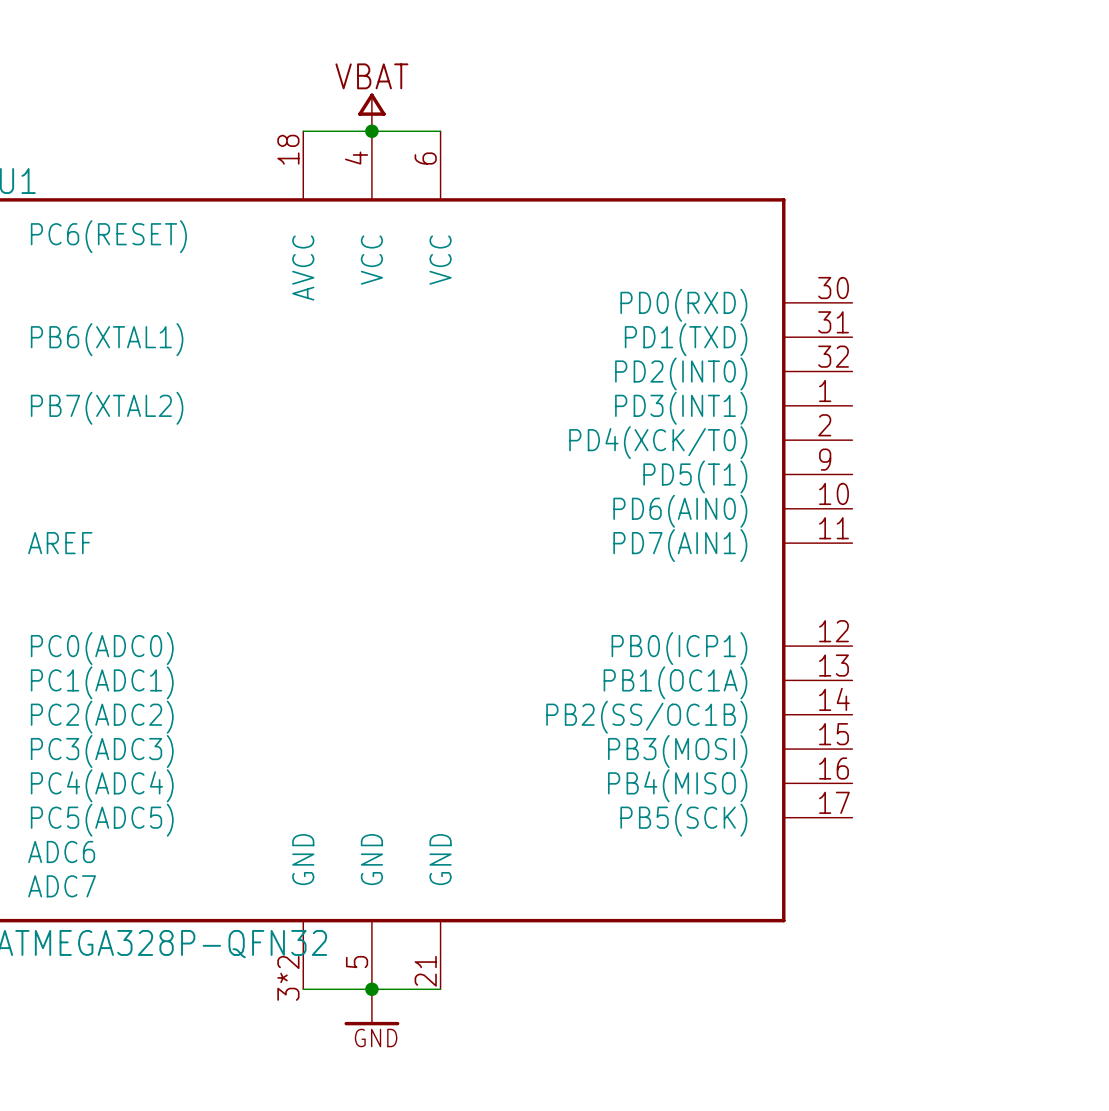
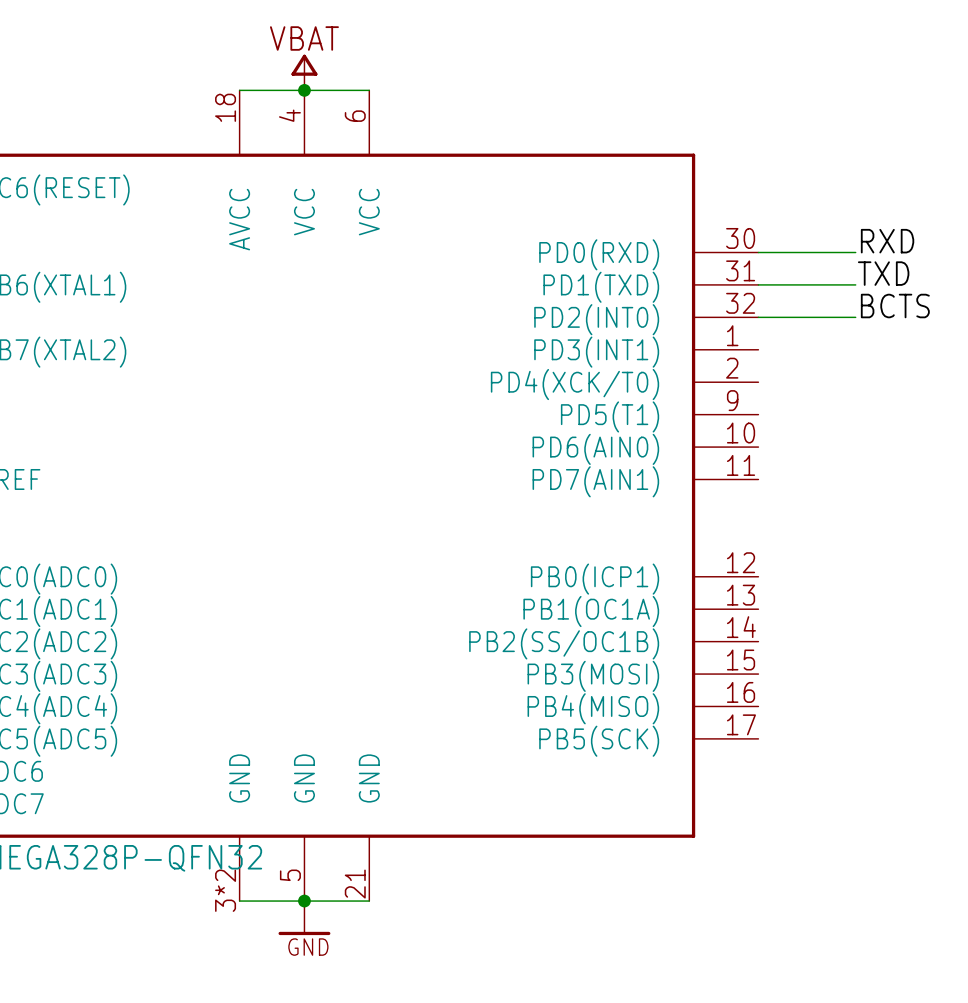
label: none -> RXD (887, 241)
wire: none -> (758, 252) (855, 252)
label: none -> TXD (883, 273)
wire: none -> (758, 284) (855, 284)
label: none -> BCTS (895, 306)
wire: none -> (758, 317) (855, 317)

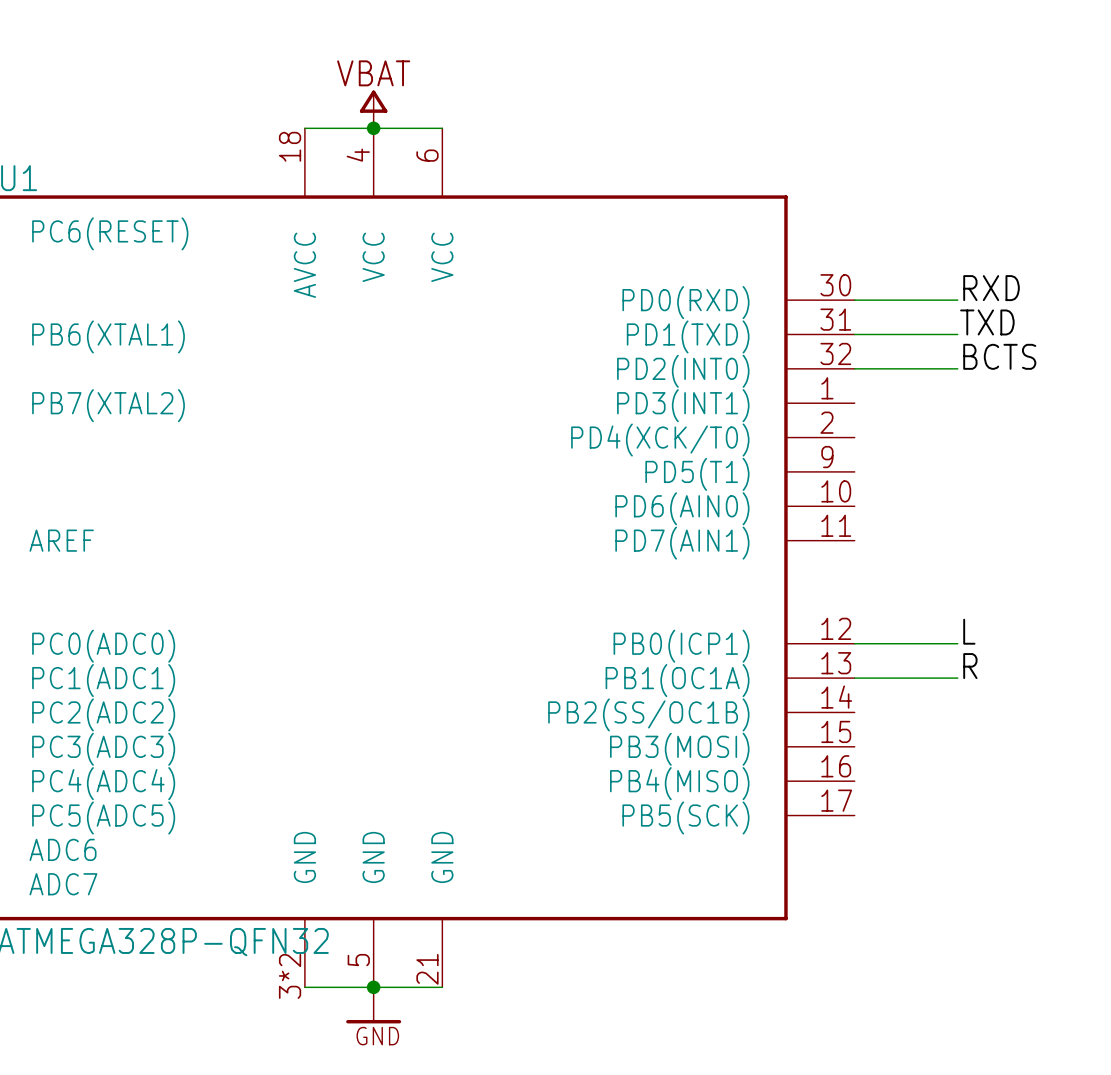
label: none -> L (969, 631)
wire: none -> (854, 643) (957, 643)
label: none -> R (970, 666)
wire: none -> (854, 678) (957, 678)

